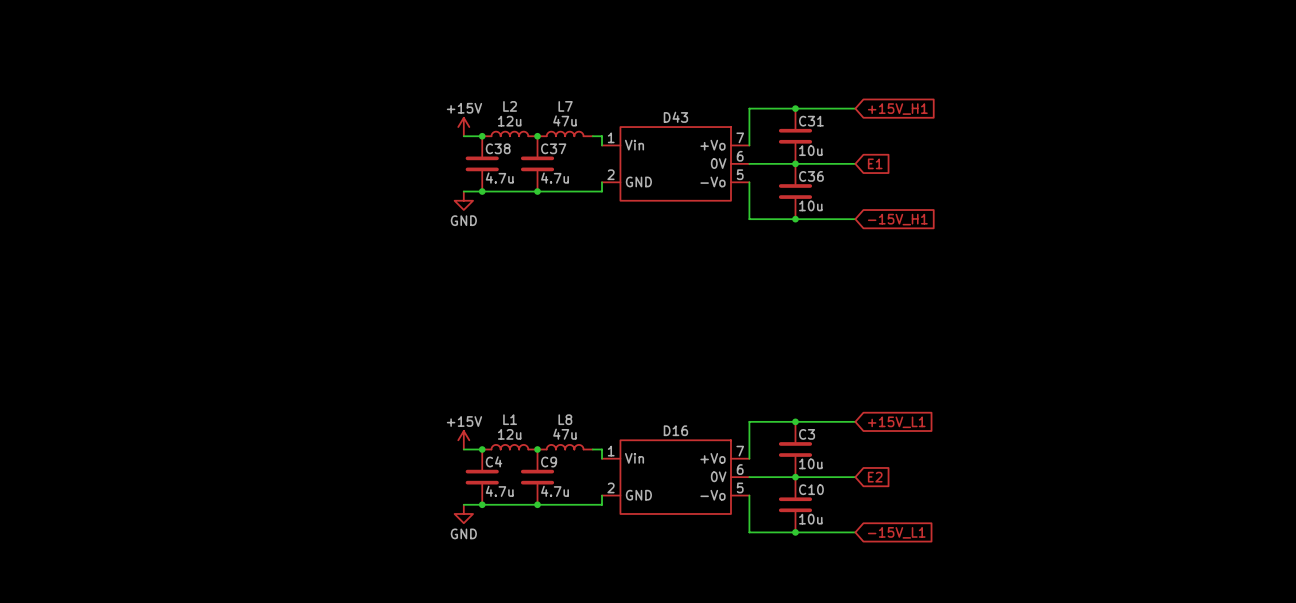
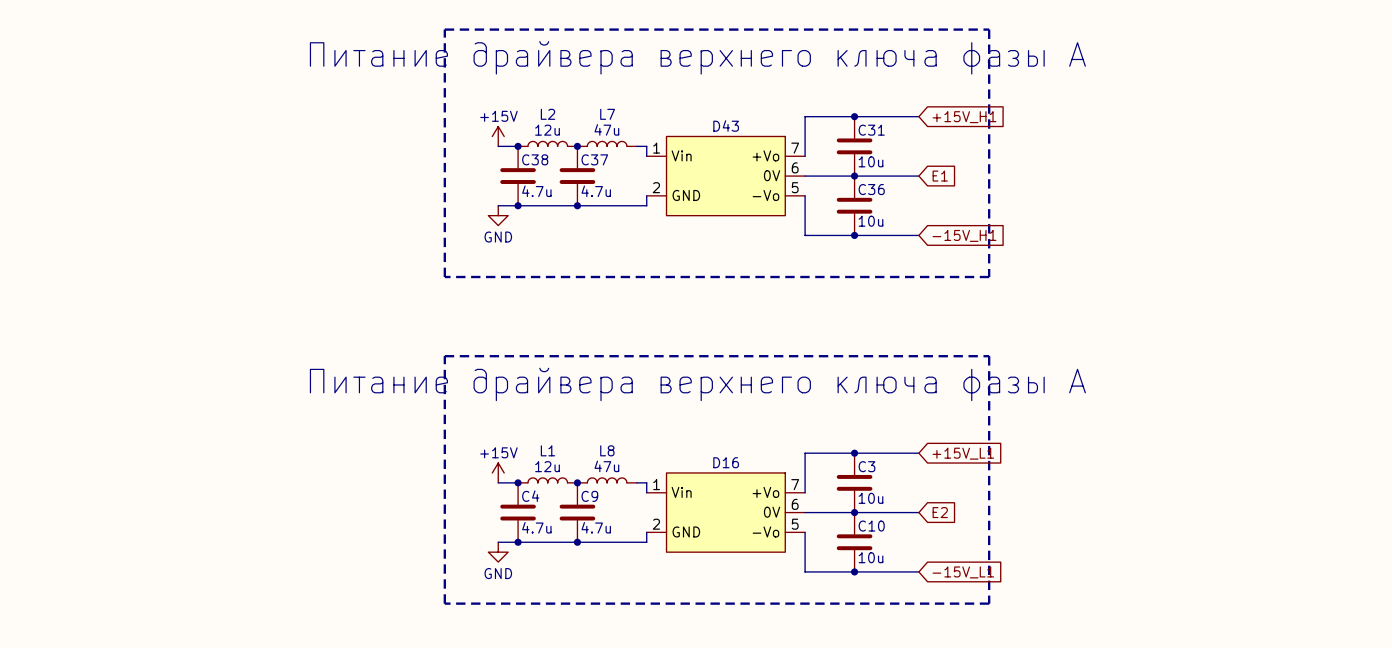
line: none -> (444, 29) (989, 29) (989, 277) (444, 277) (444, 29)
text: none -> Питание драйвера верхнего ключа фазы А (697, 57)
line: none -> (444, 356) (444, 603) (989, 603) (989, 356) (444, 356)
text: none -> Питание драйвера верхнего ключа фазы А (697, 384)

